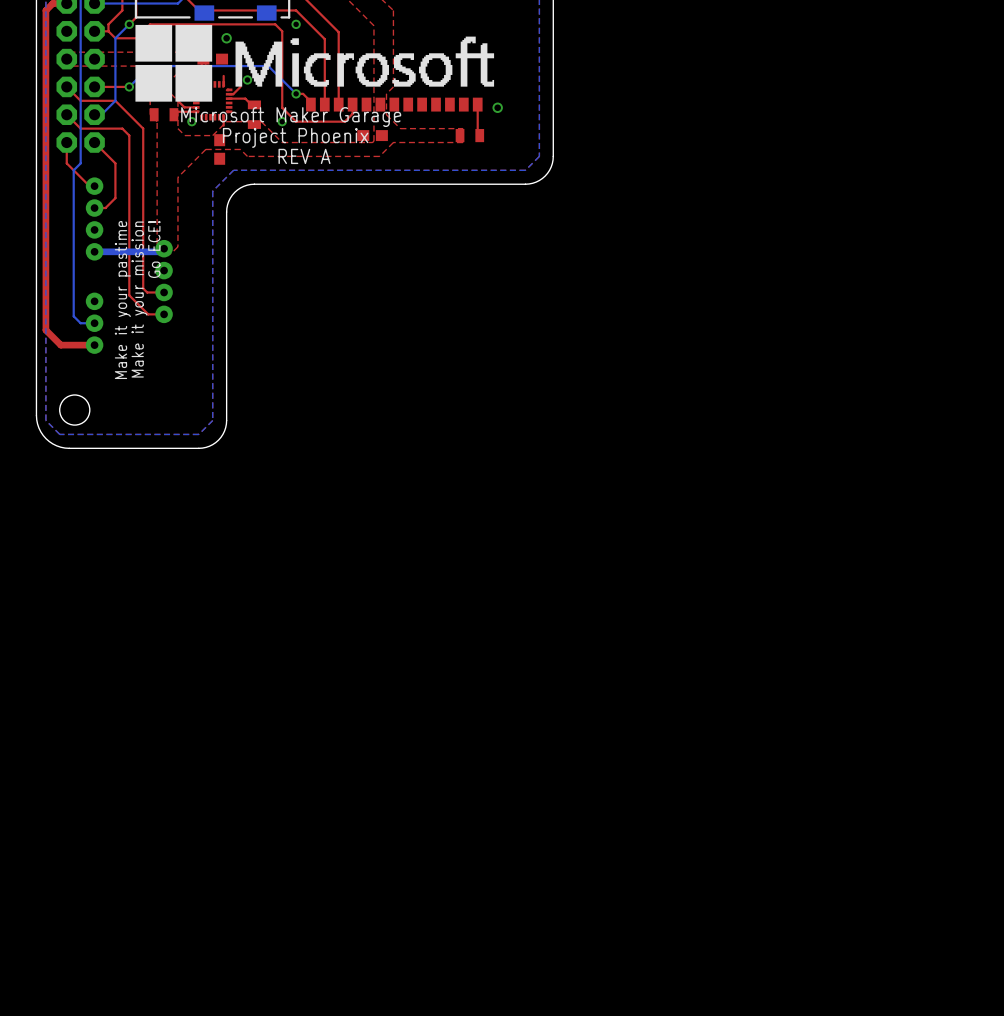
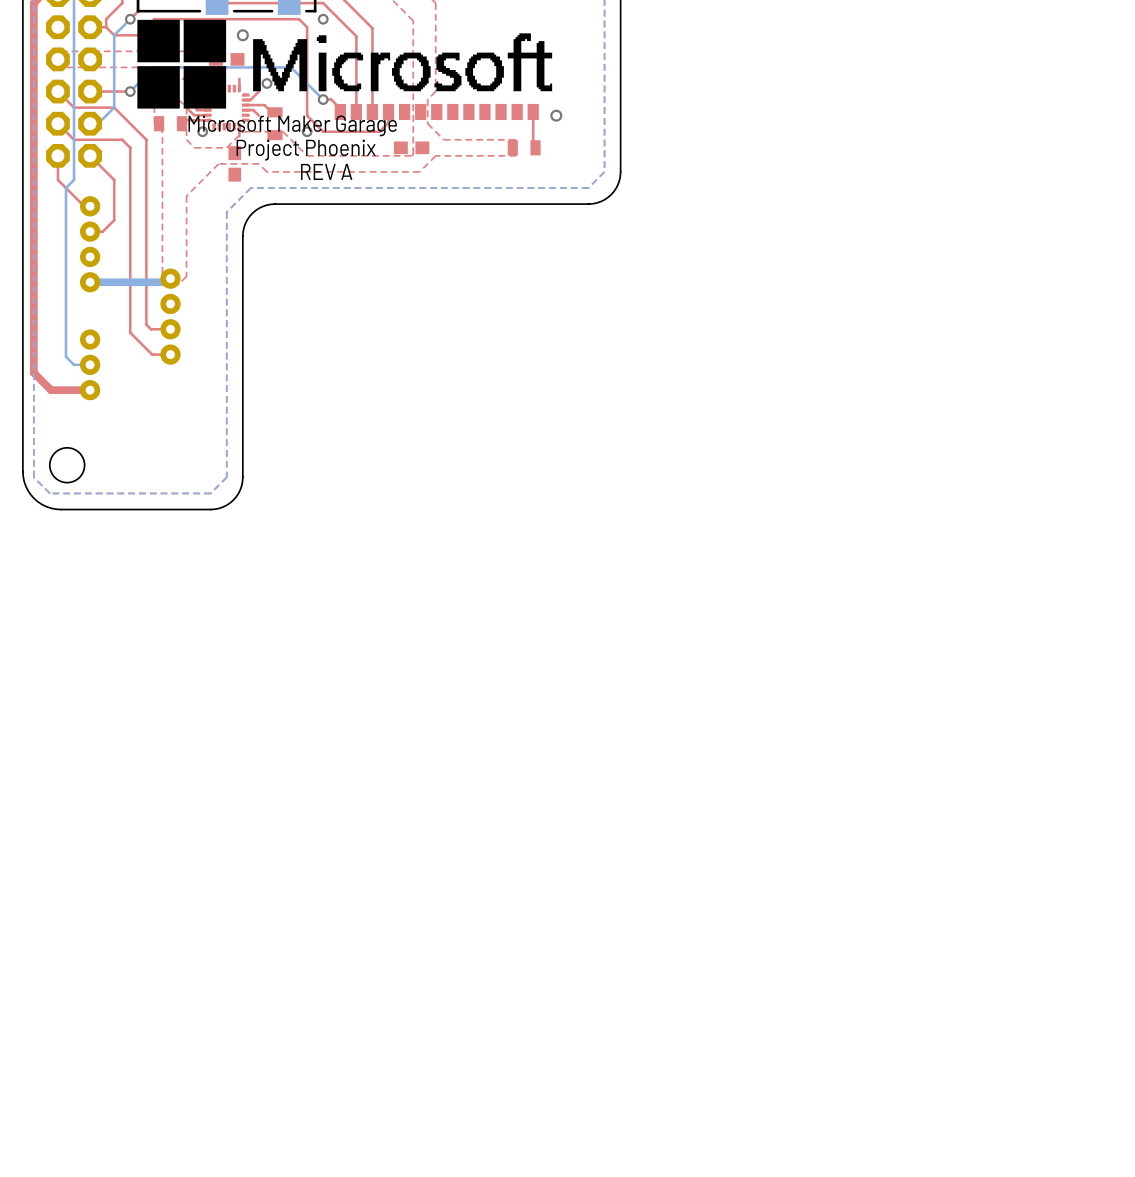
top track: none -> (196, 107) (196, 110) (207, 110)
top track: none -> (245, 110) (253, 110) (258, 115)
text: Go ECE! (154, 249) -> none
text: Make it your mission (139, 299) -> none
text: Make it your pastime (122, 300) -> none

